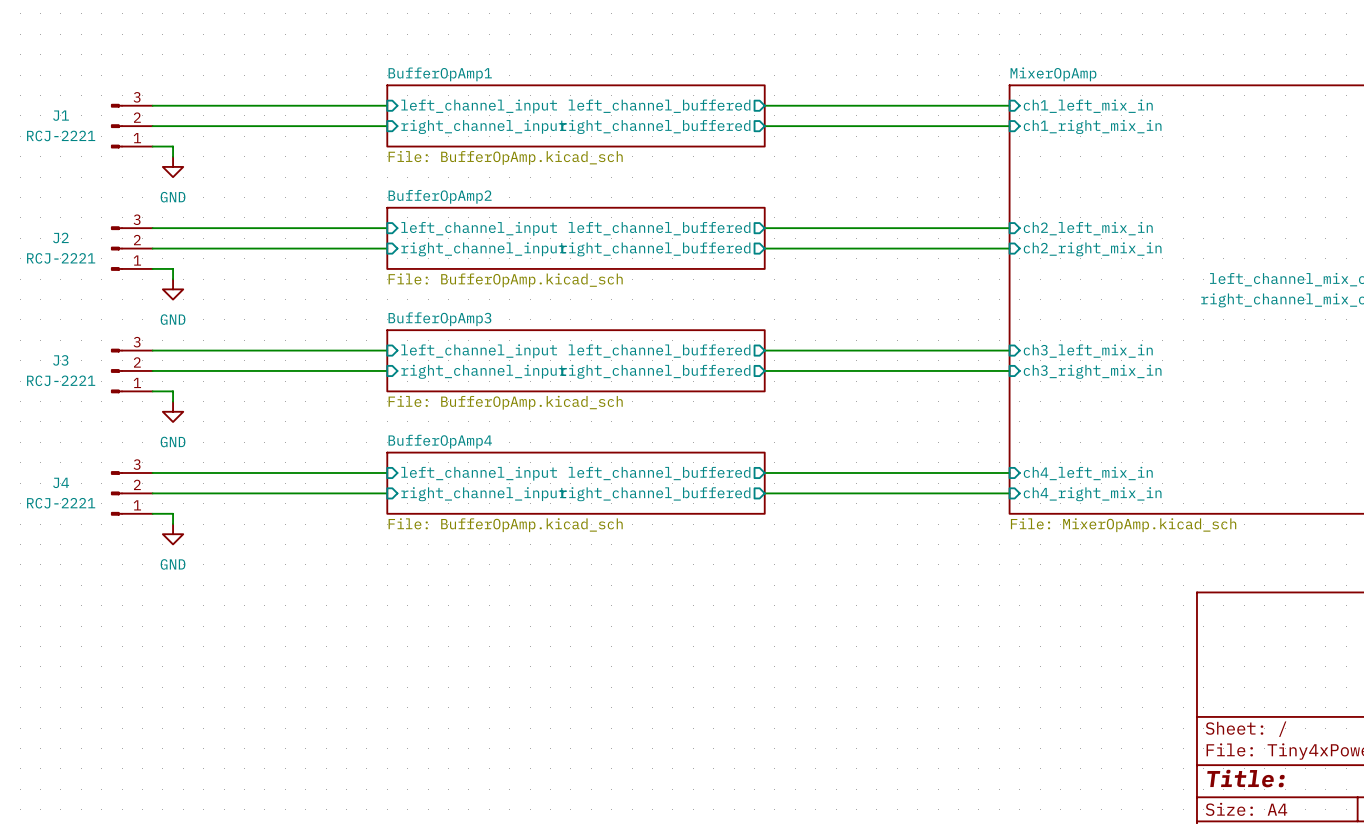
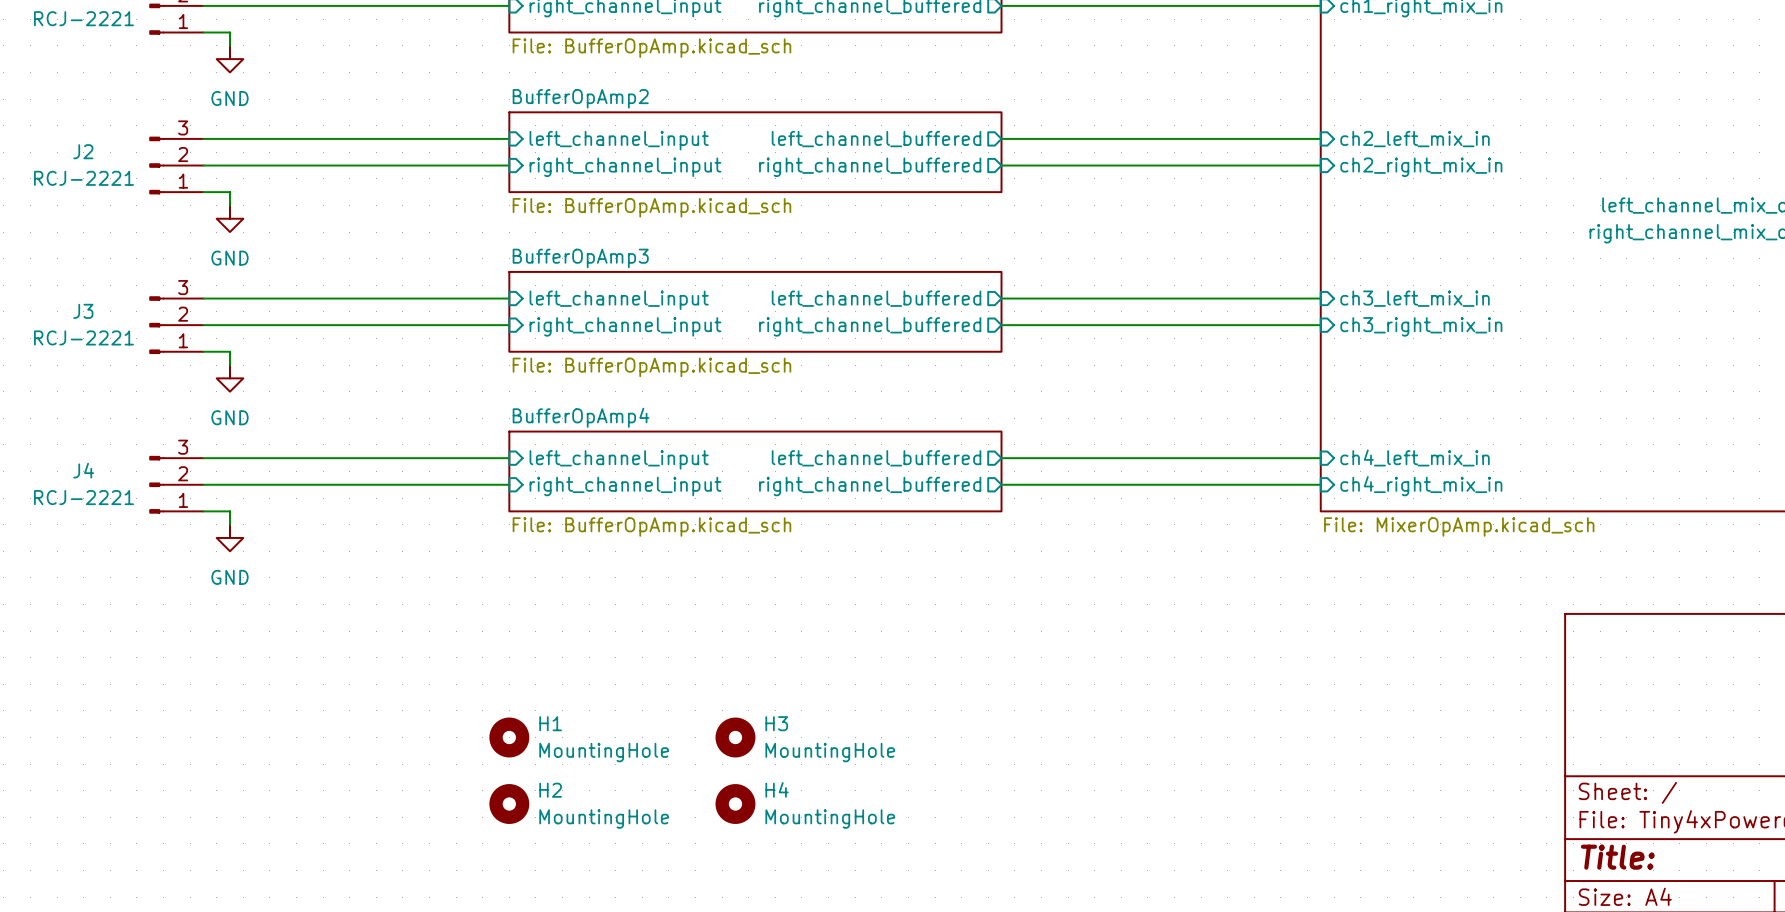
H1: none -> MountingHole (509, 737)
H3: none -> MountingHole (735, 737)
H2: none -> MountingHole (509, 804)
H4: none -> MountingHole (735, 804)

